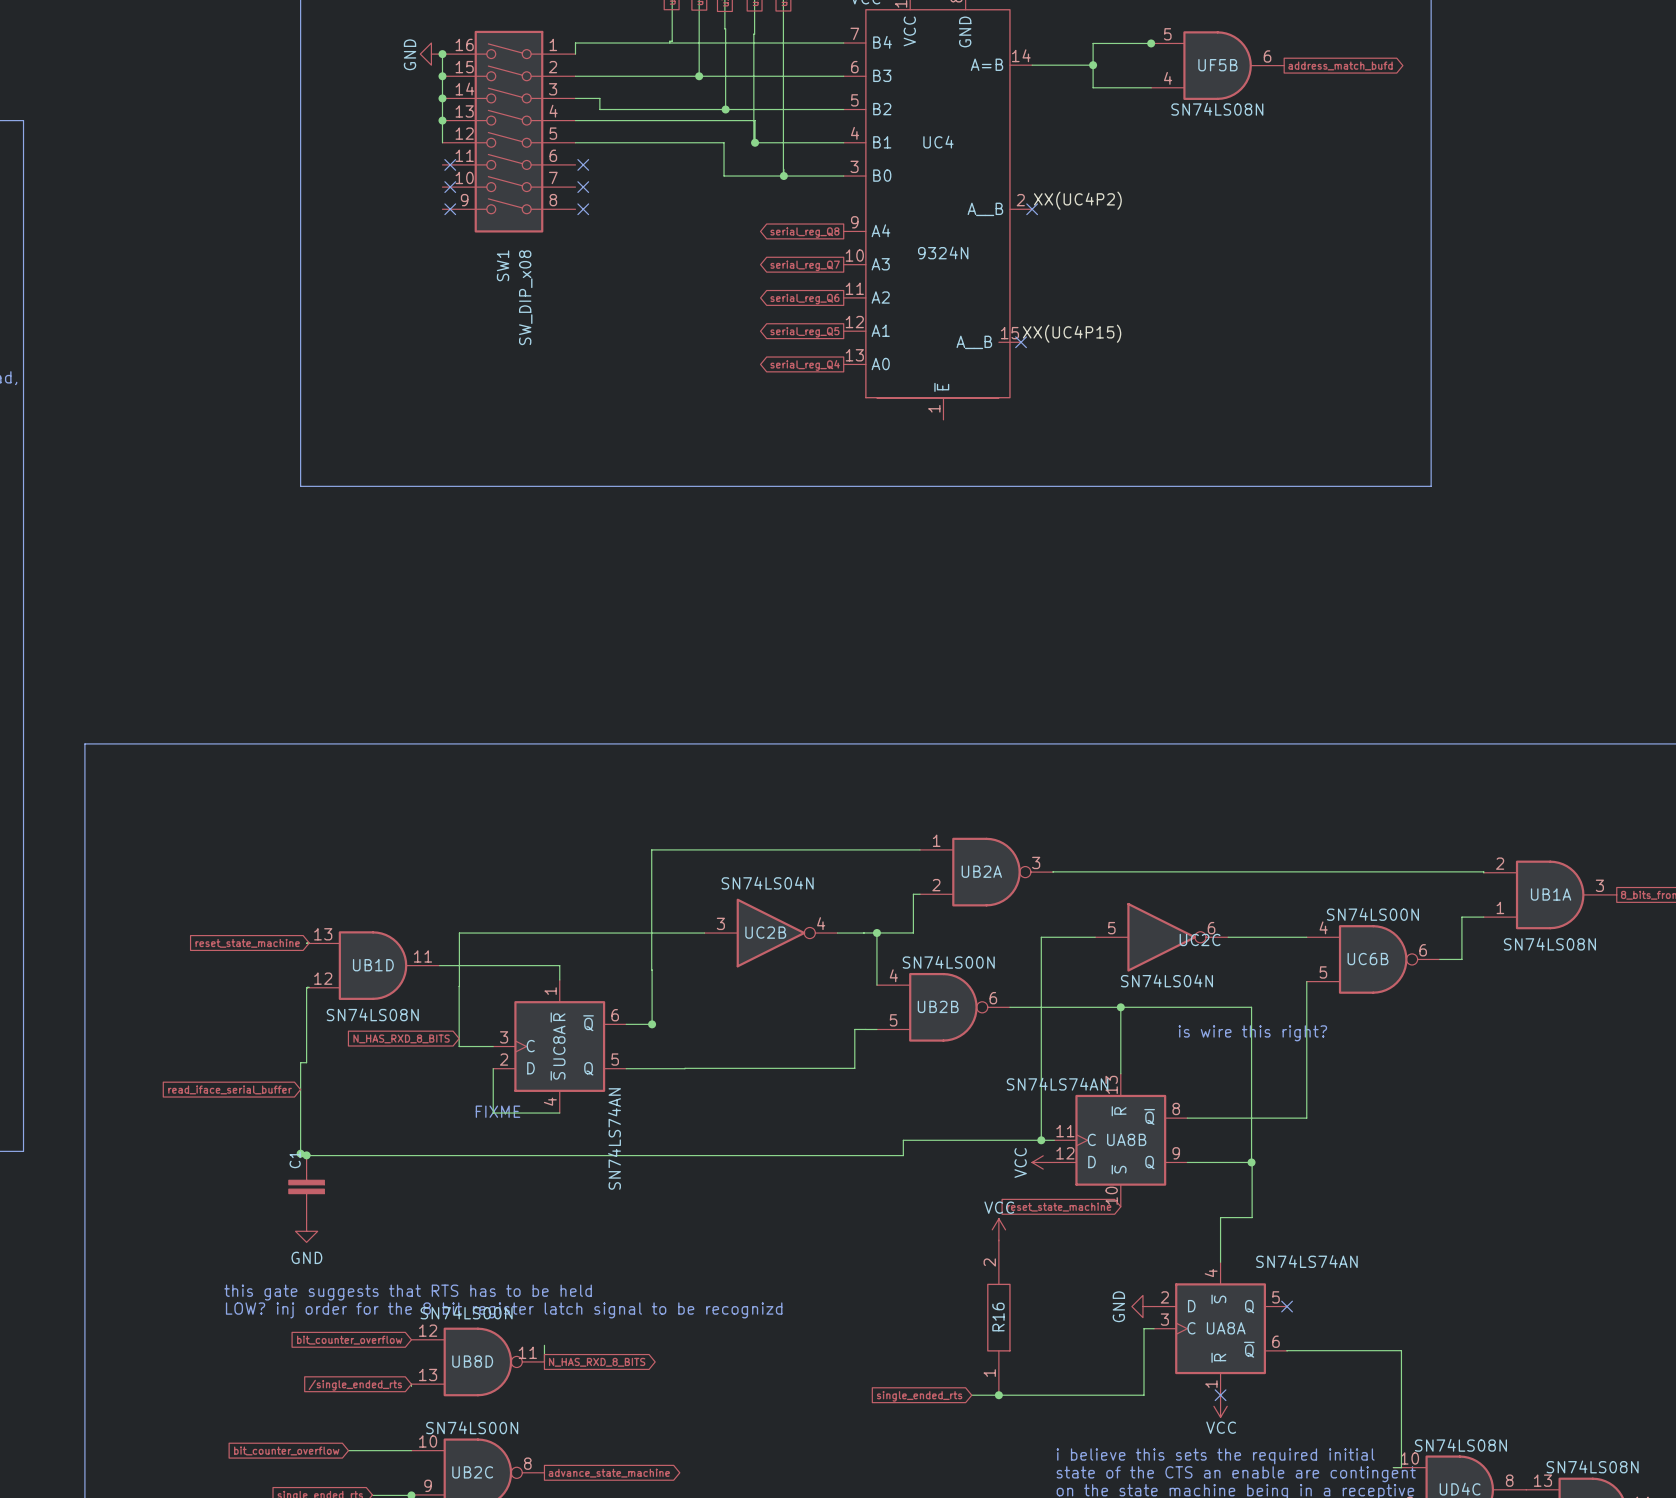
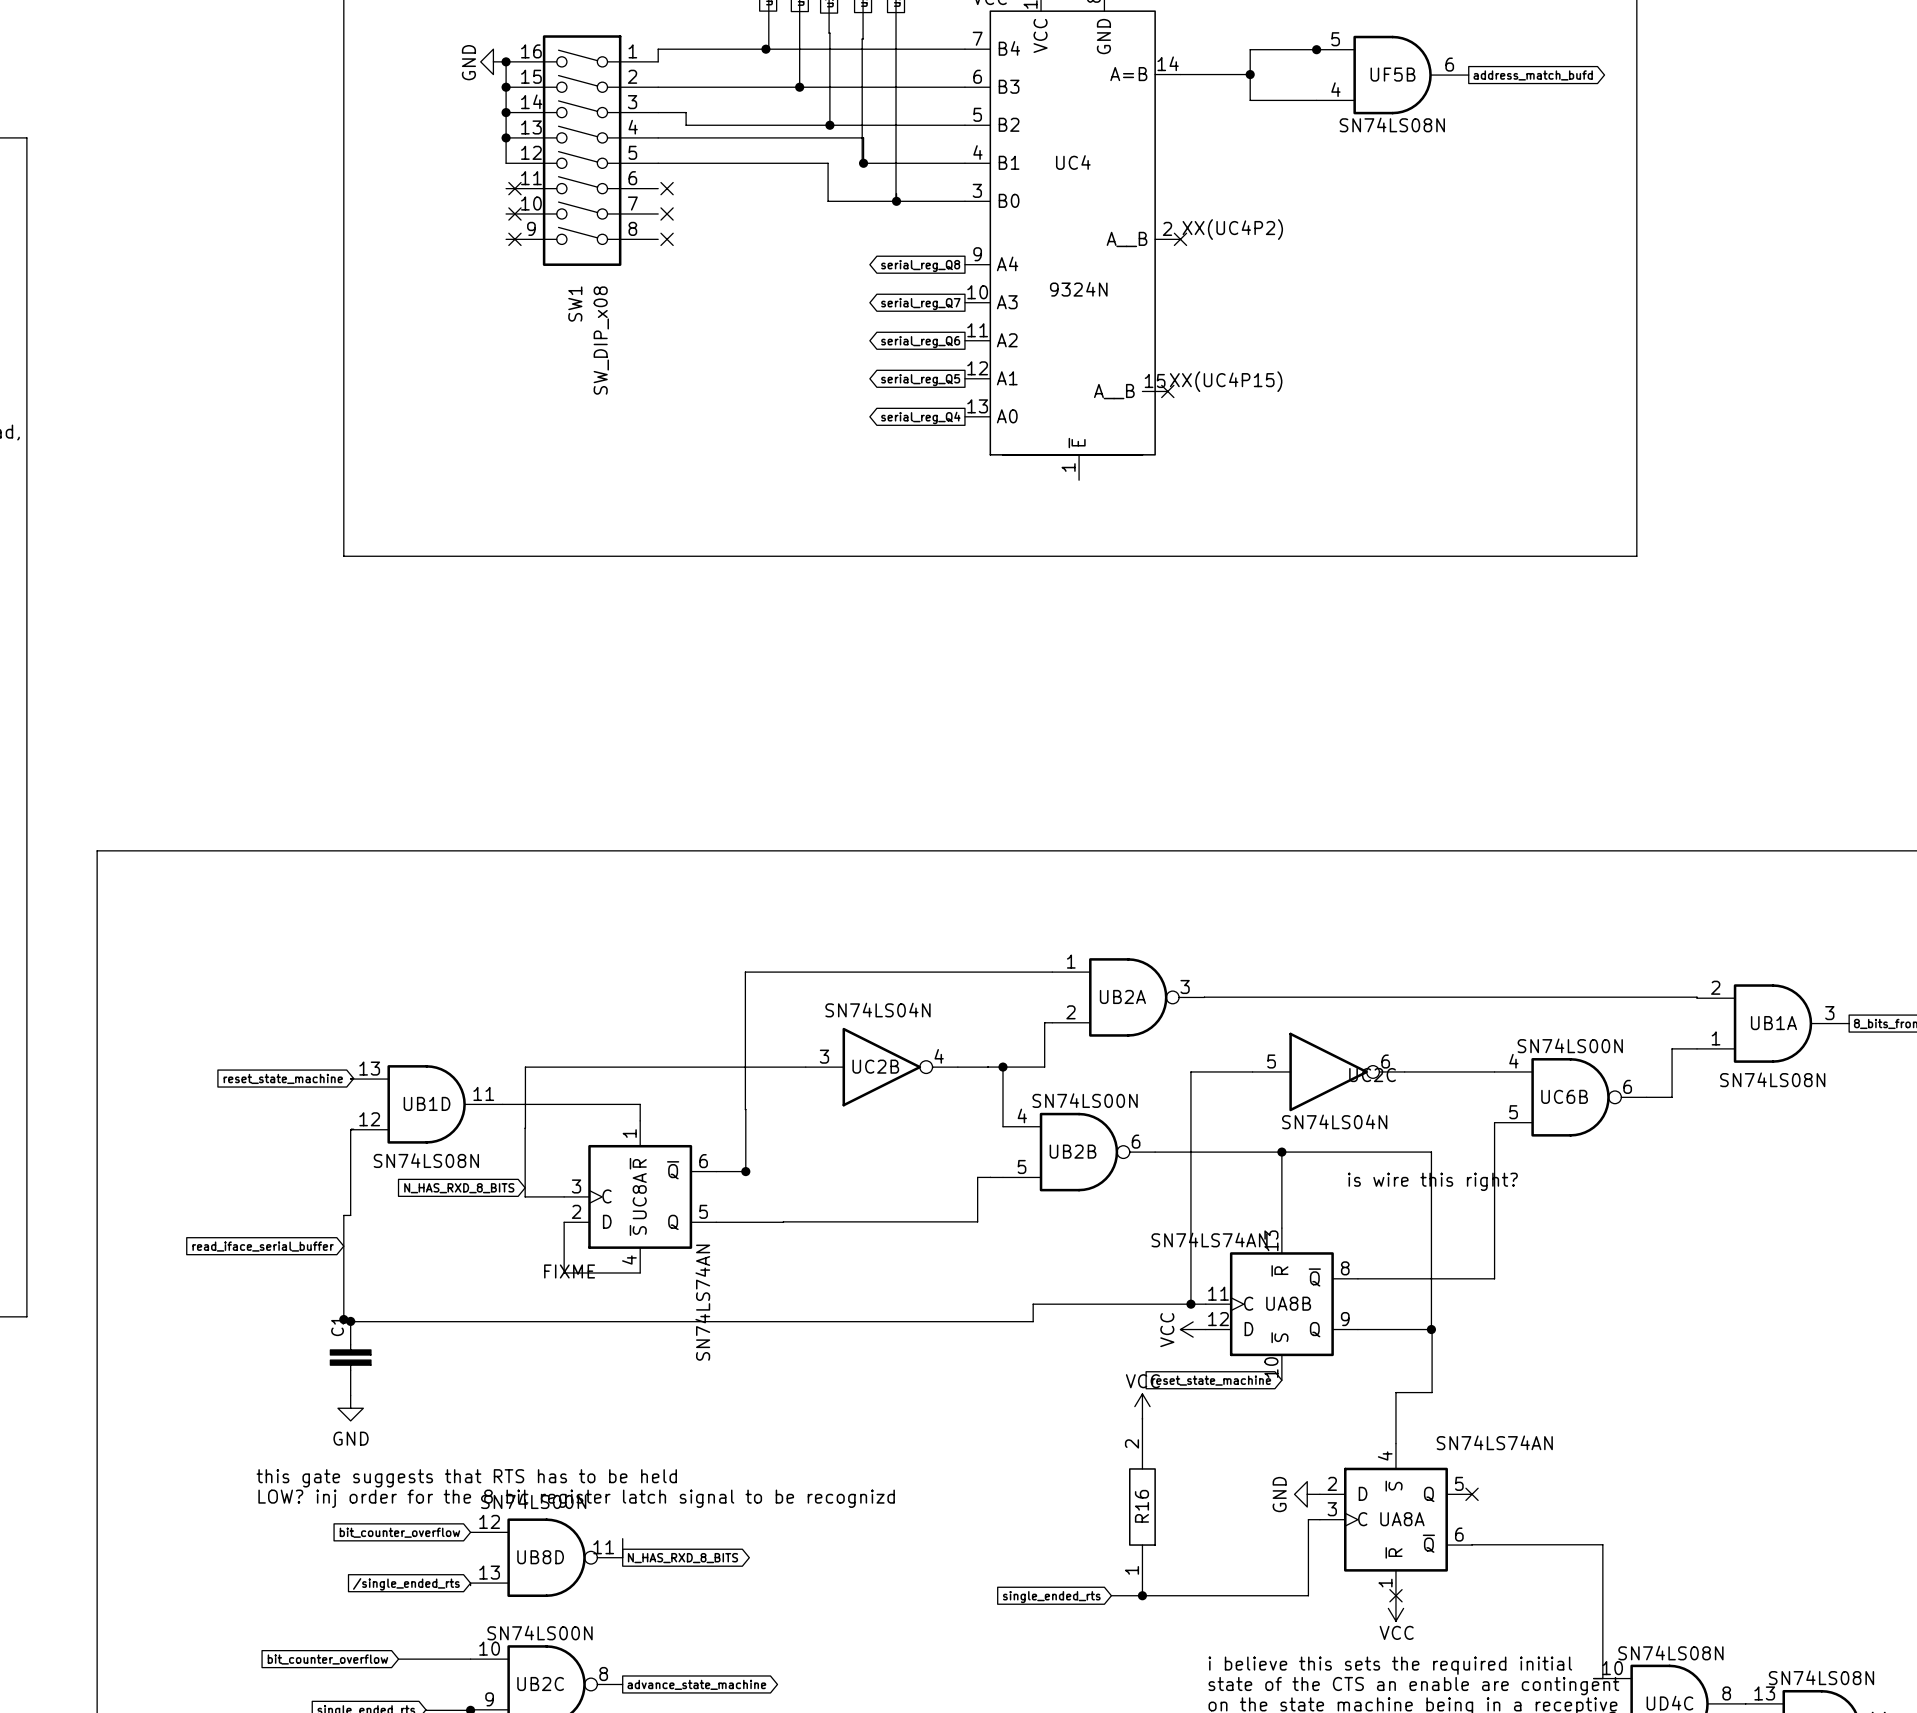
junction: none -> (765, 49)

